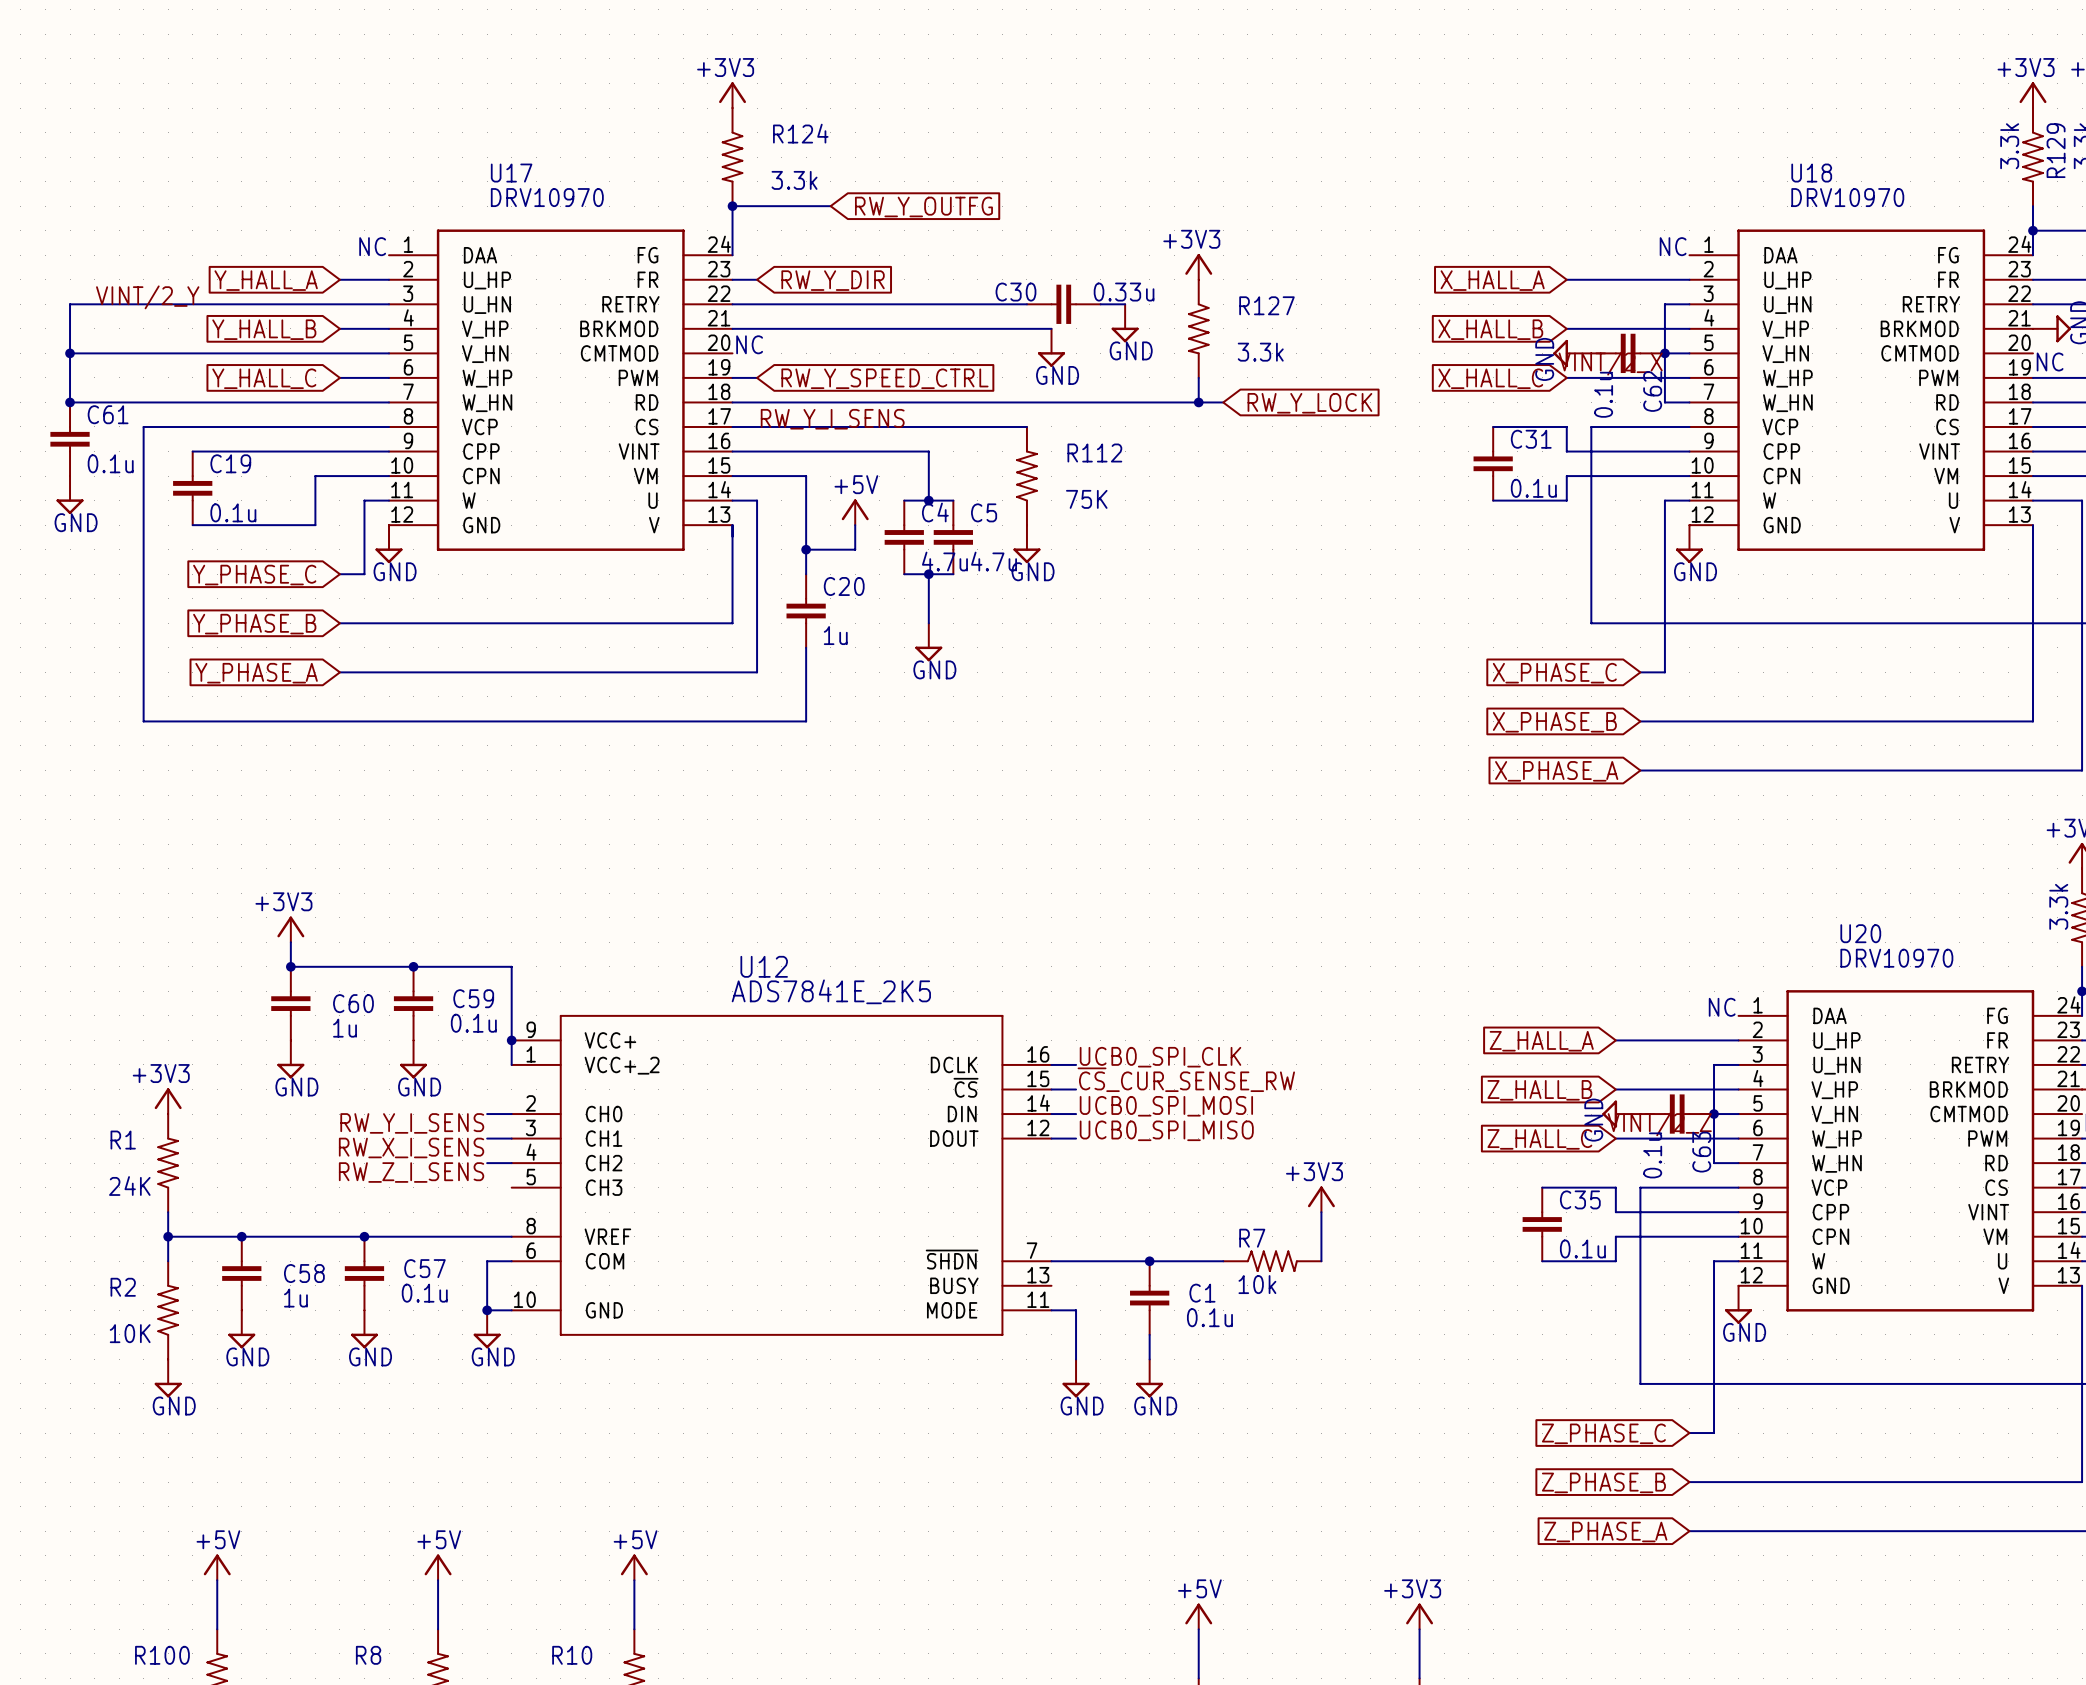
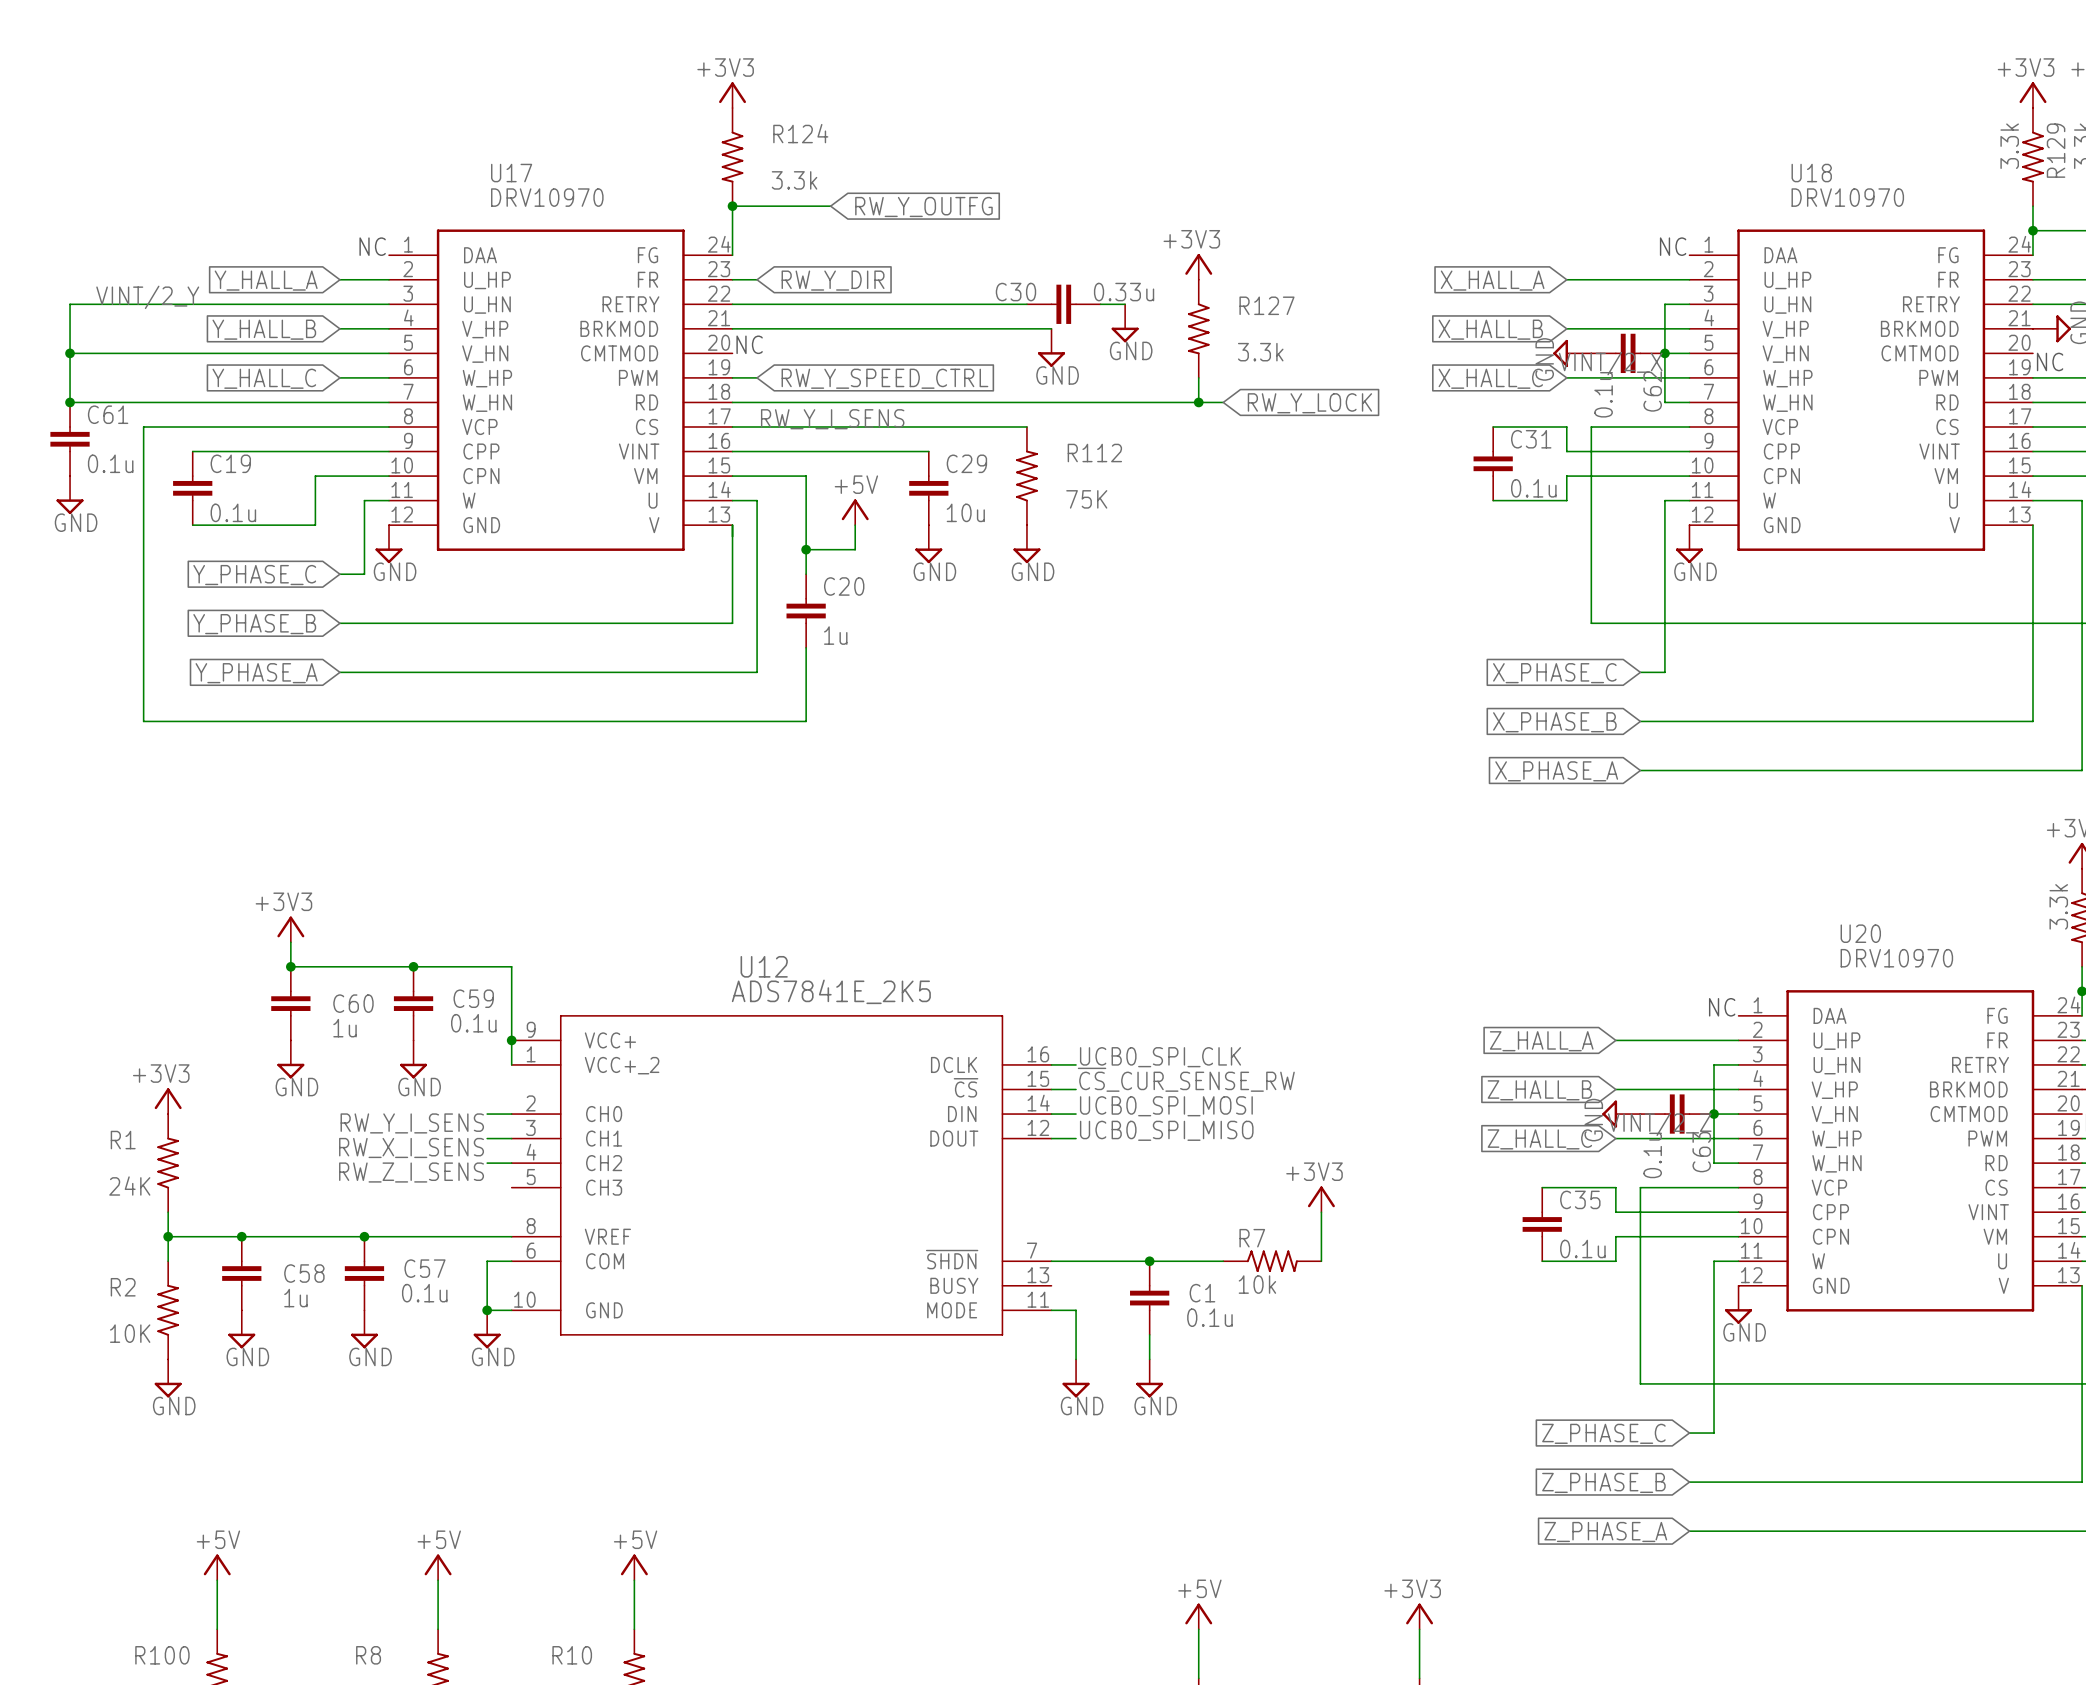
C29: none -> 10u (928, 488)
wire: (904, 500) (953, 500) -> none
junction: (928, 500) -> none
C4: 4.7u (904, 537) -> none
C5: 4.7u (953, 537) -> none
wire: (904, 574) (953, 574) -> none
wire: (928, 574) (928, 623) -> none
junction: (928, 574) -> none
power symbol position: GND (928, 642) -> GND (928, 544)

